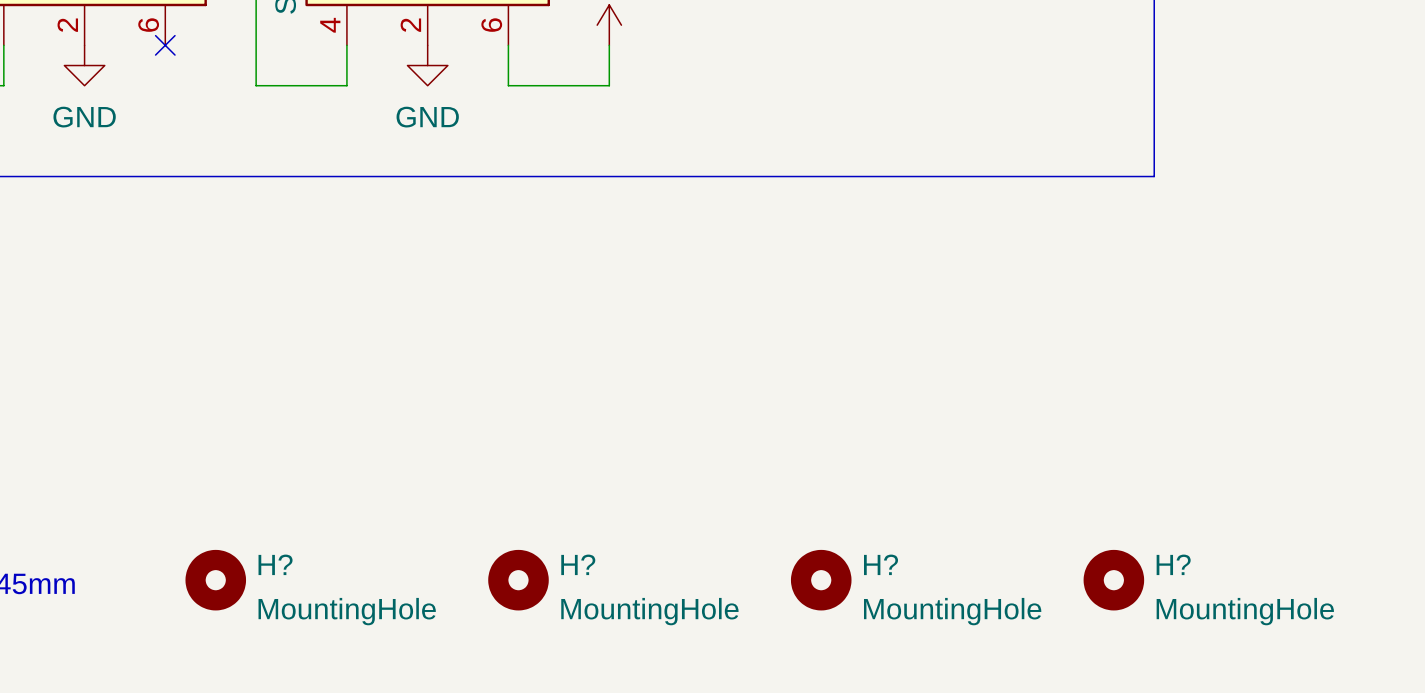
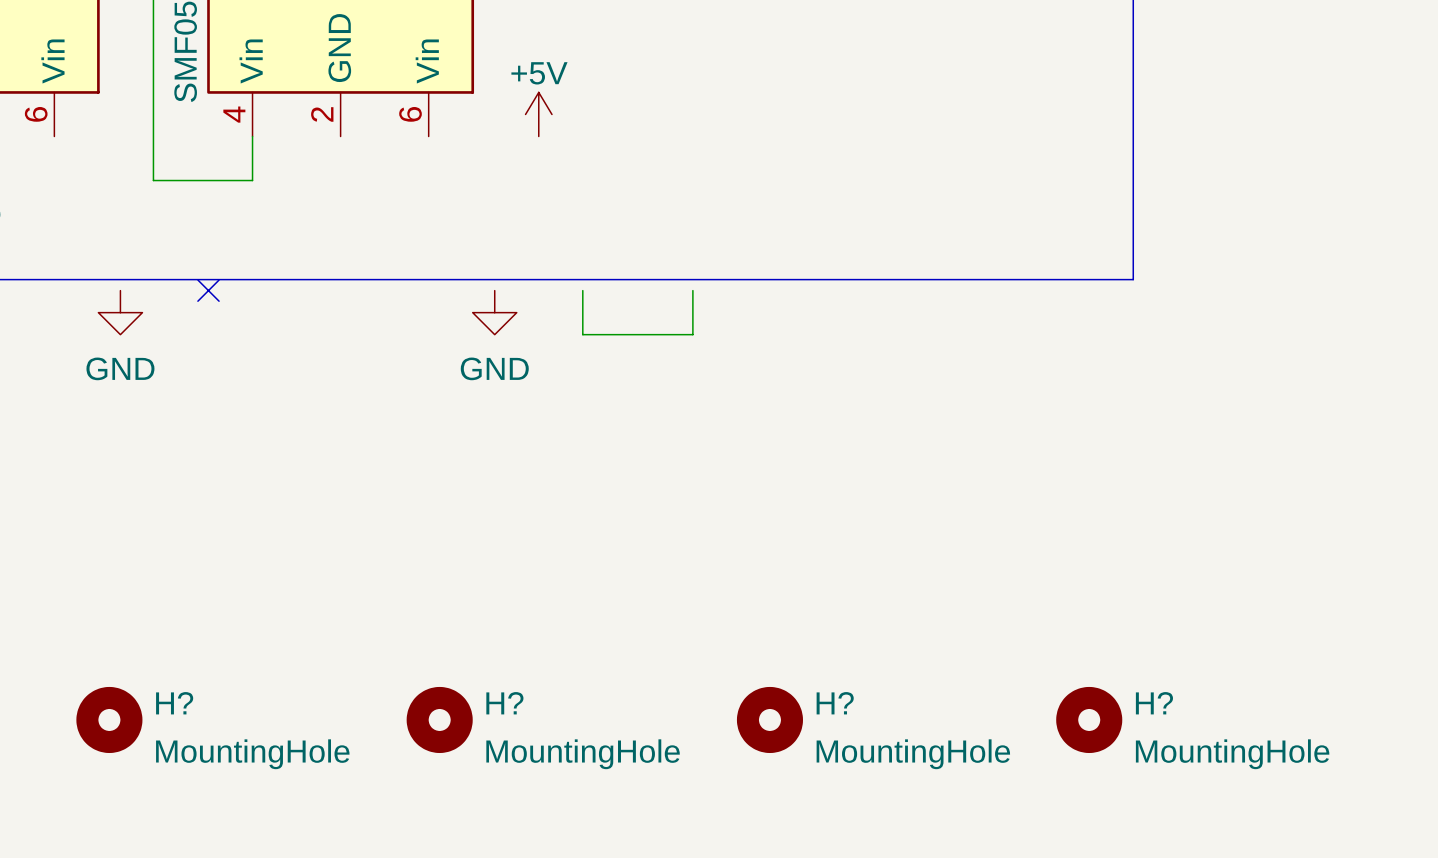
no-connect mark: (165, 45) -> none
wire: (508, 45) (508, 85) (609, 85) (609, 45) -> (582, 290) (582, 334) (692, 334) (692, 290)
power symbol: GND (427, 65) -> none
no-connect mark: none -> (208, 290)
power symbol: none -> GND (120, 312)
power symbol: none -> GND (494, 312)

